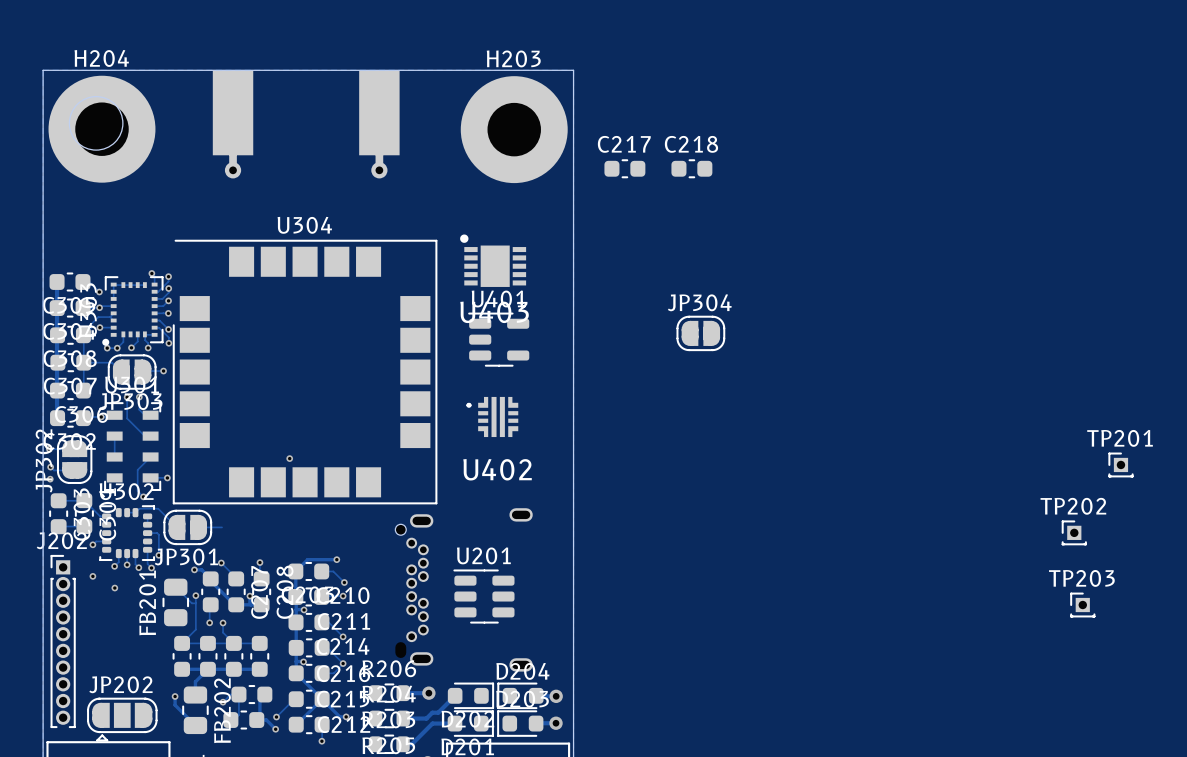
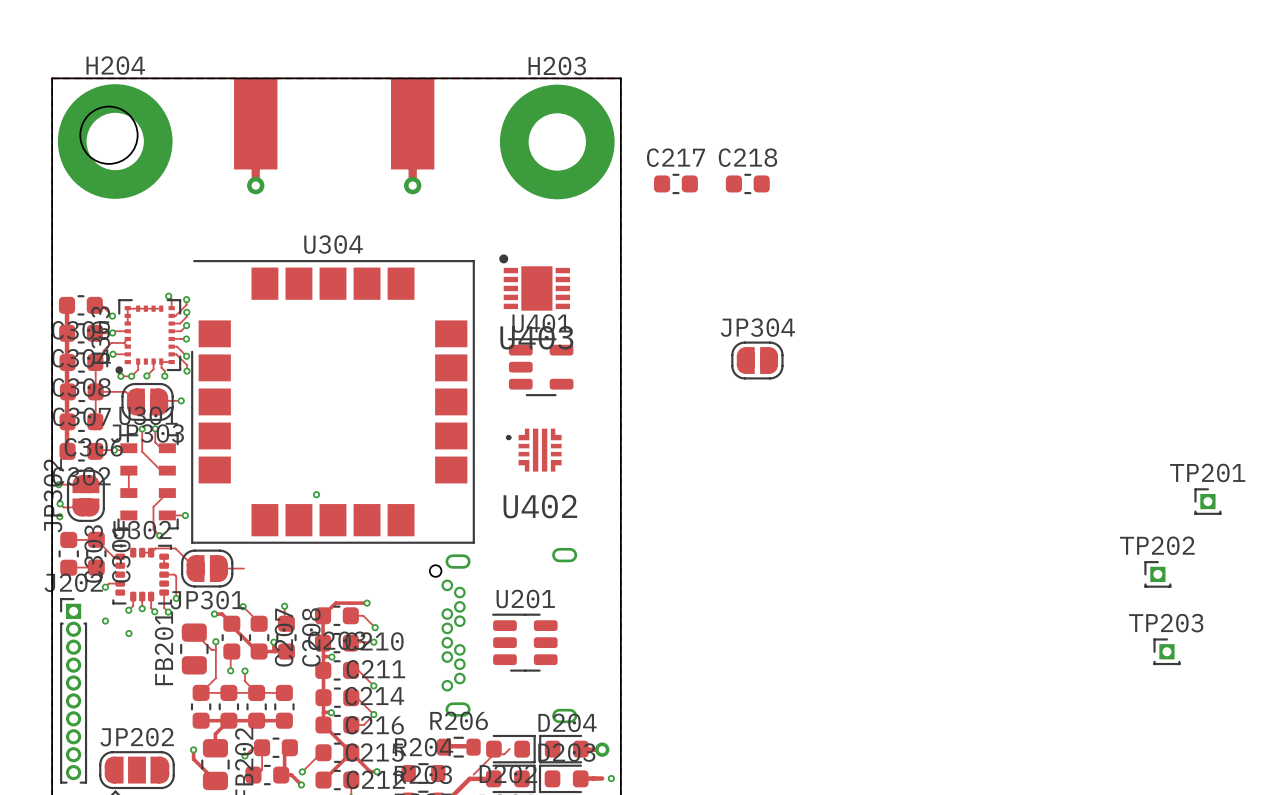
R206 position: (389, 693) -> (458, 747)
via: (428, 693) -> none
track: (455, 695) (438, 712) (432, 712) (426, 718) (403, 718) -> none
track: none -> (509, 748) (504, 754) (493, 754) (473, 774)
via size: [549, 716, 563, 730] -> [607, 774, 615, 783]

